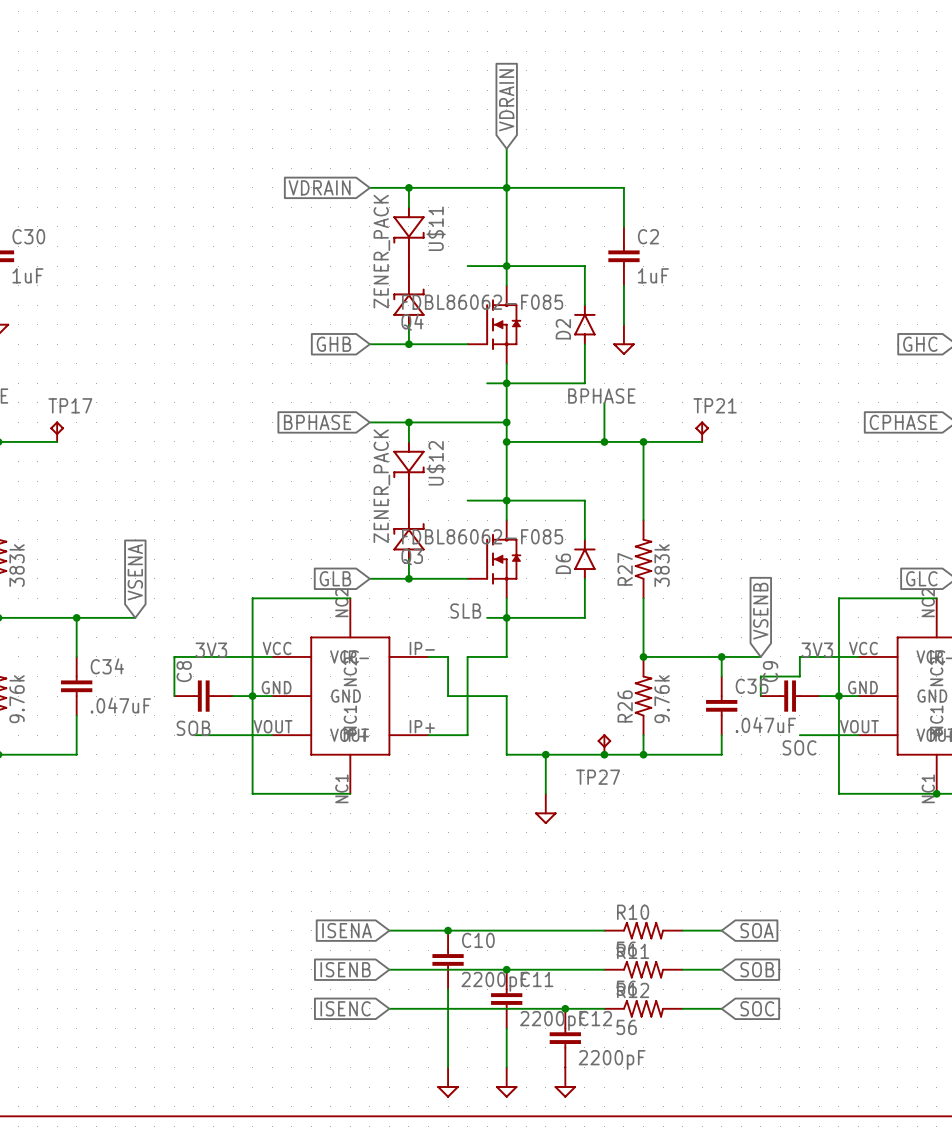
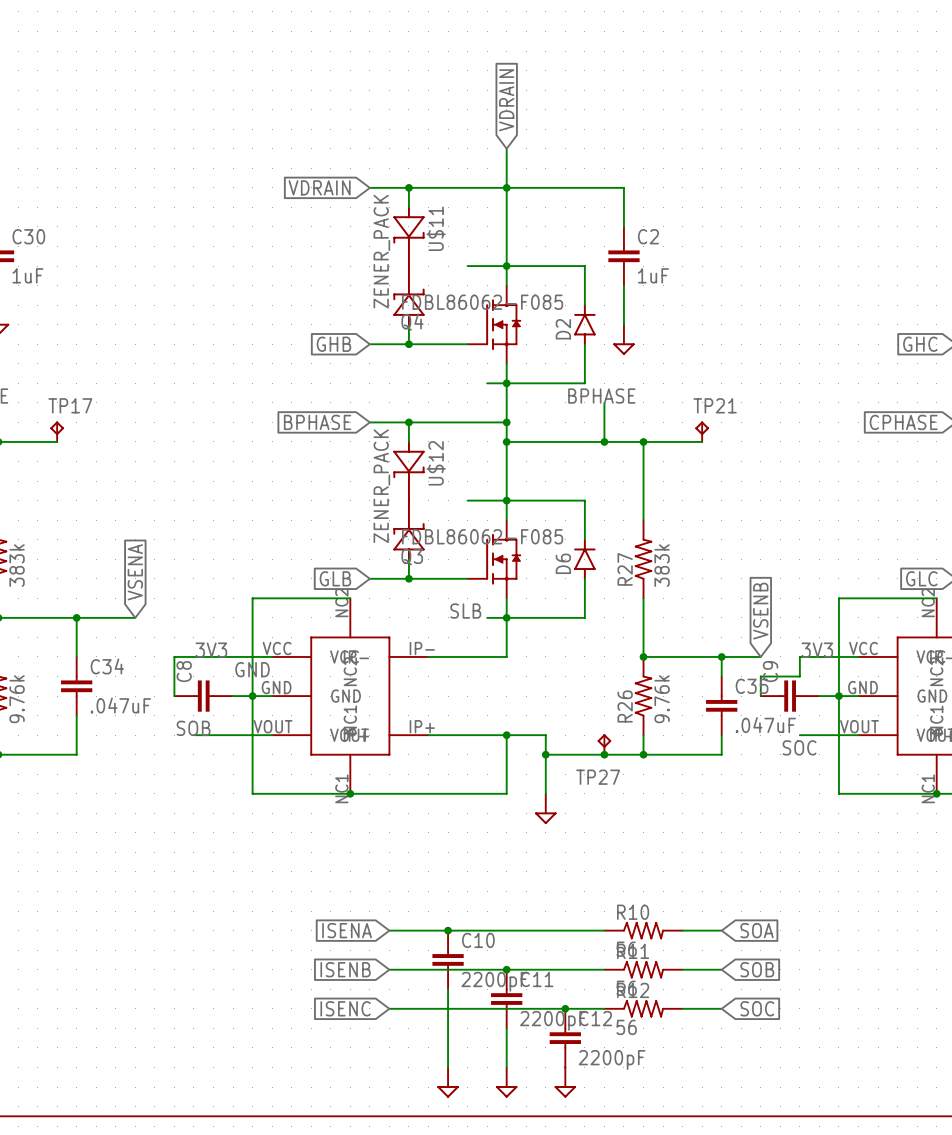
wire: (448, 656) (448, 696) (506, 696) (506, 735) -> none
wire: (467, 656) (467, 735) -> (467, 656) (448, 656)
label: none -> GND (252, 669)
junction: none -> (506, 735)
wire: (506, 754) (545, 754) -> (467, 735) (545, 735) (545, 754)
wire: none -> (506, 754) (506, 793) (350, 793)
junction: none -> (350, 793)

